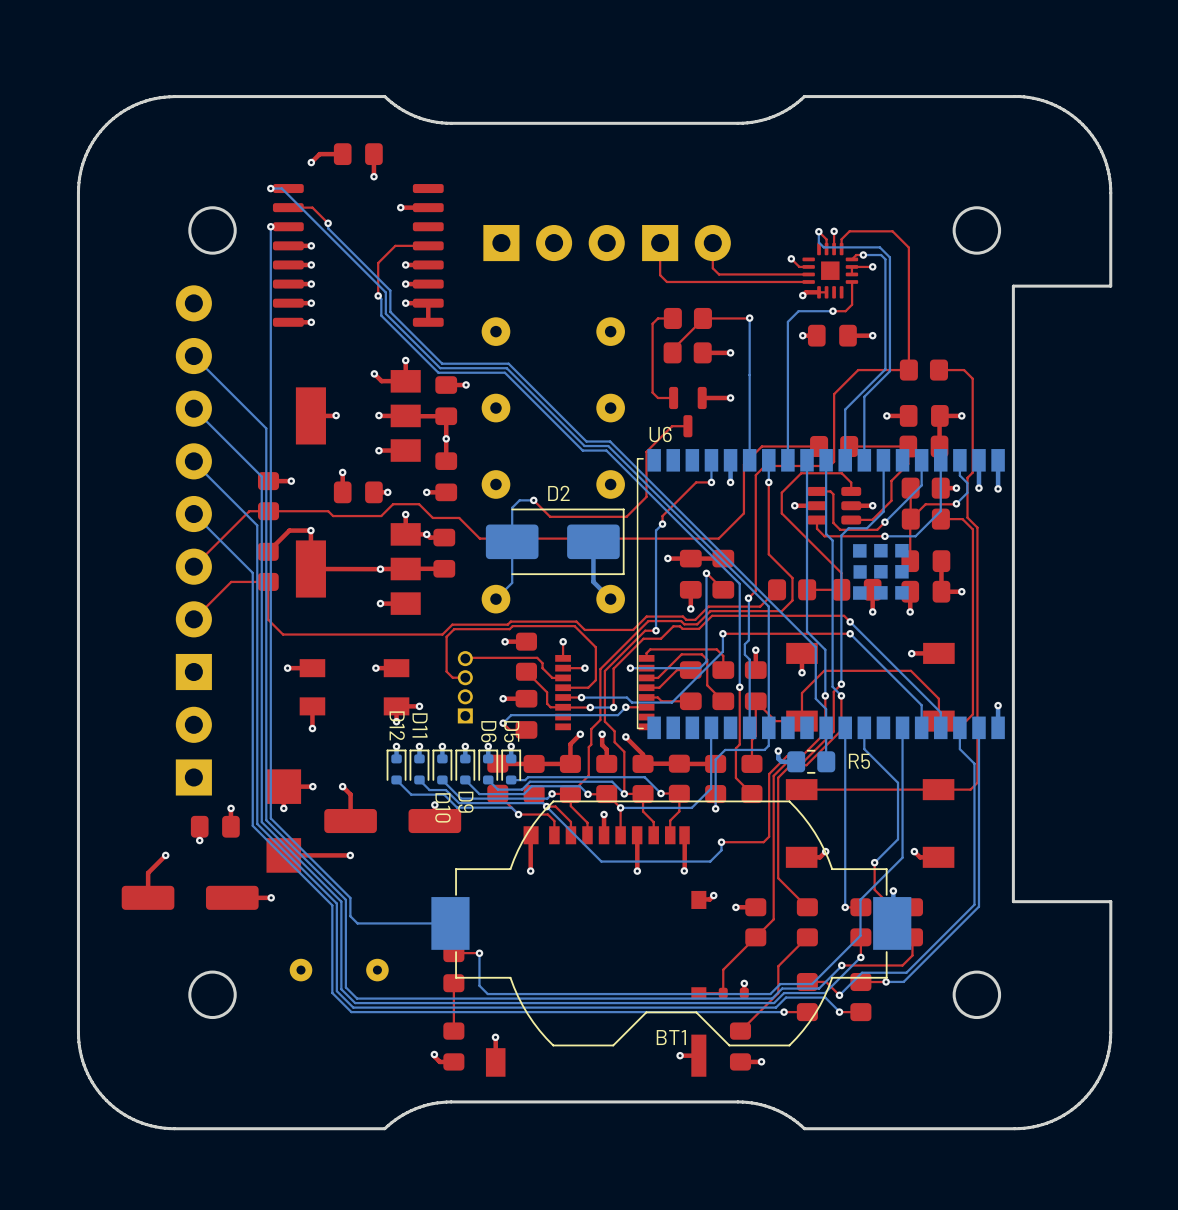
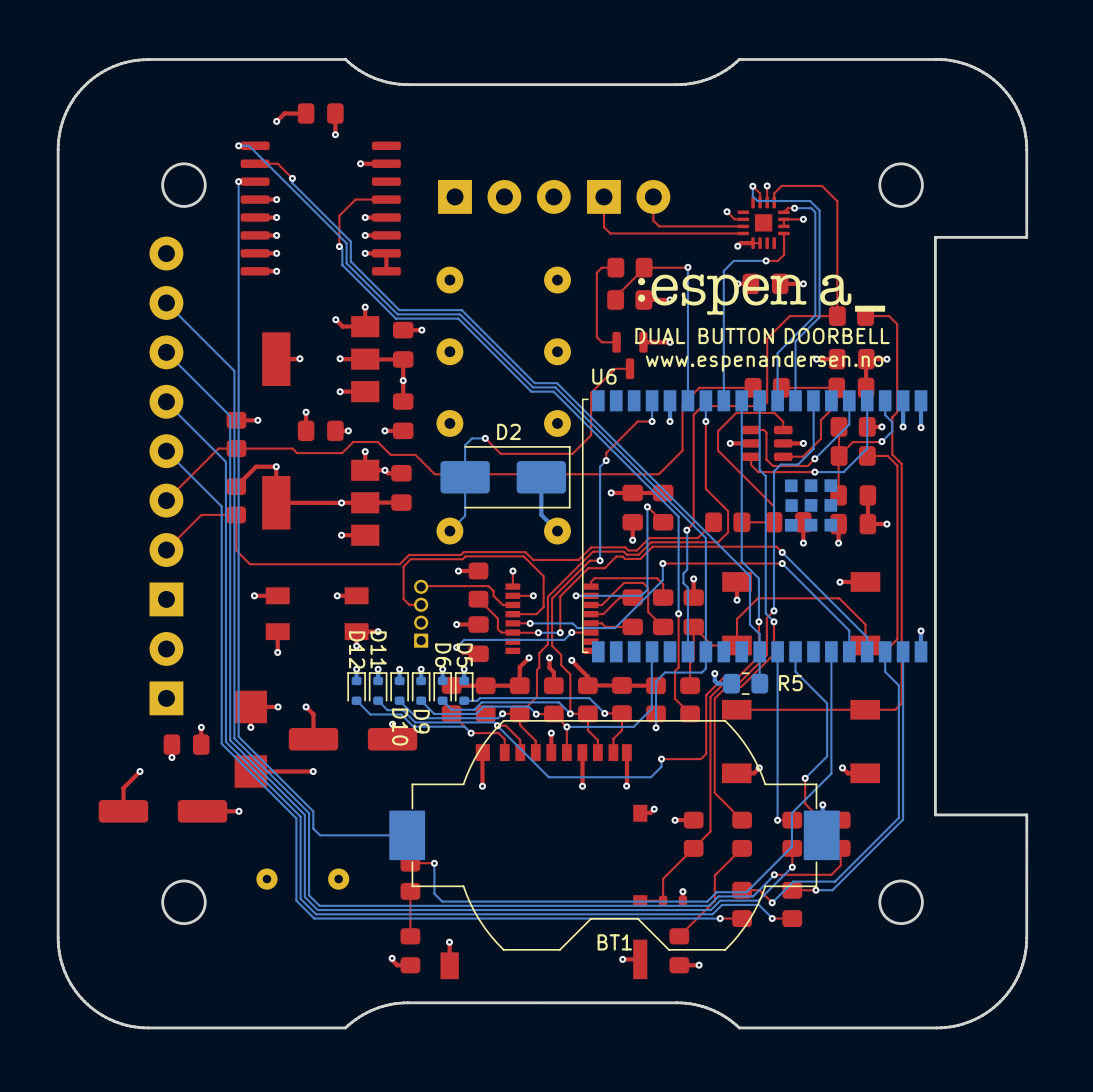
drawing: none -> [638, 274, 886, 315]
text: none -> DUAL BUTTON DOORBELL (762, 336)
text: none -> www.espenandersen.no (764, 361)

